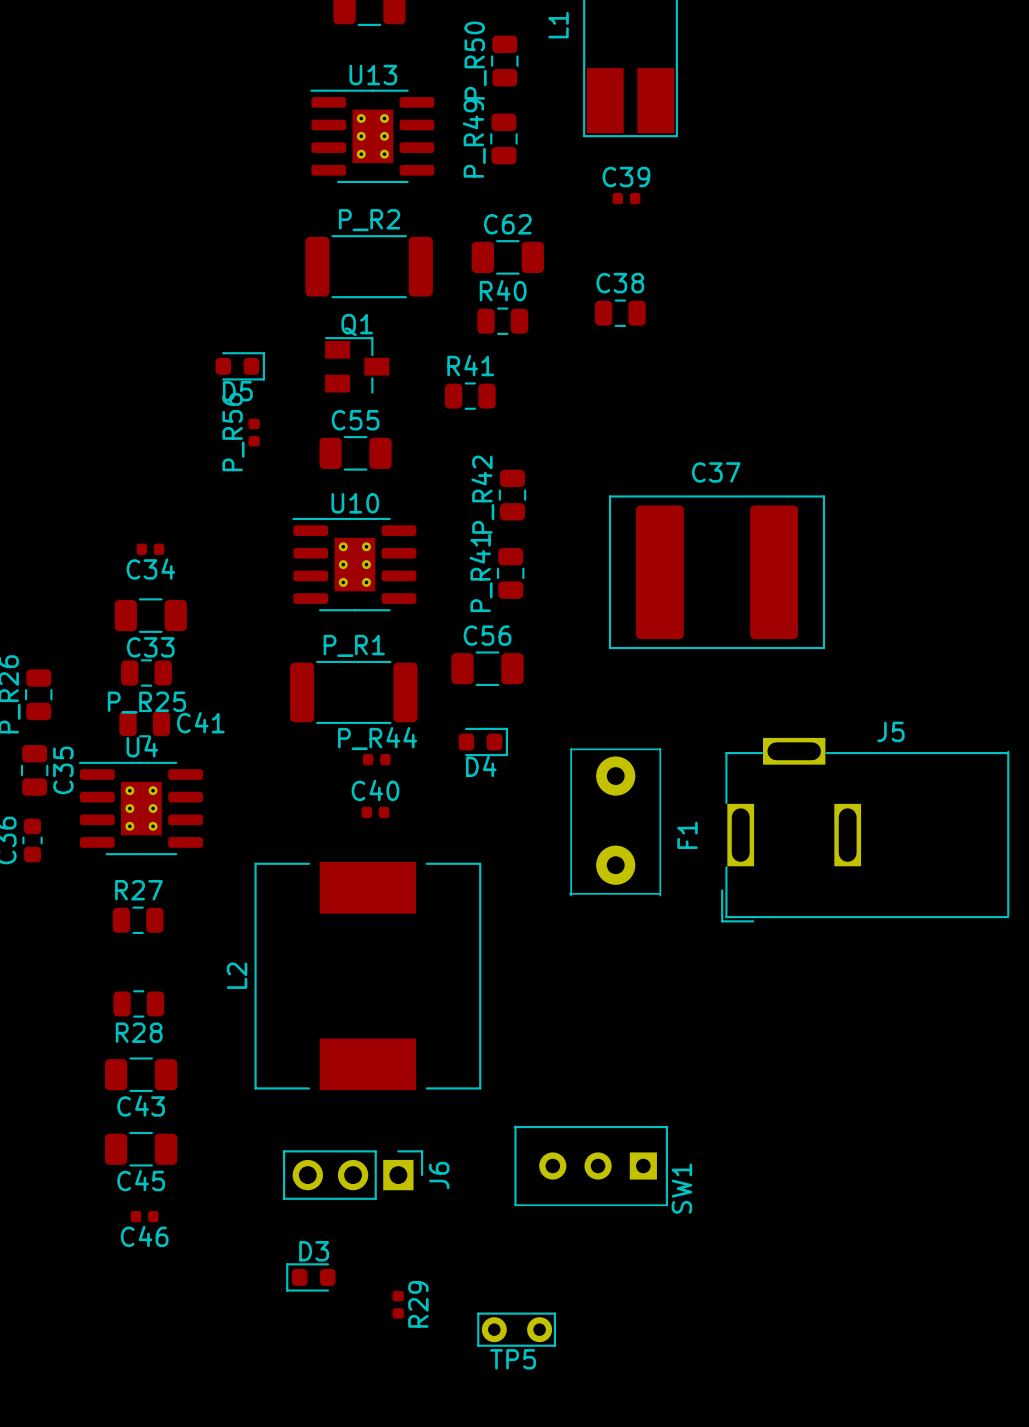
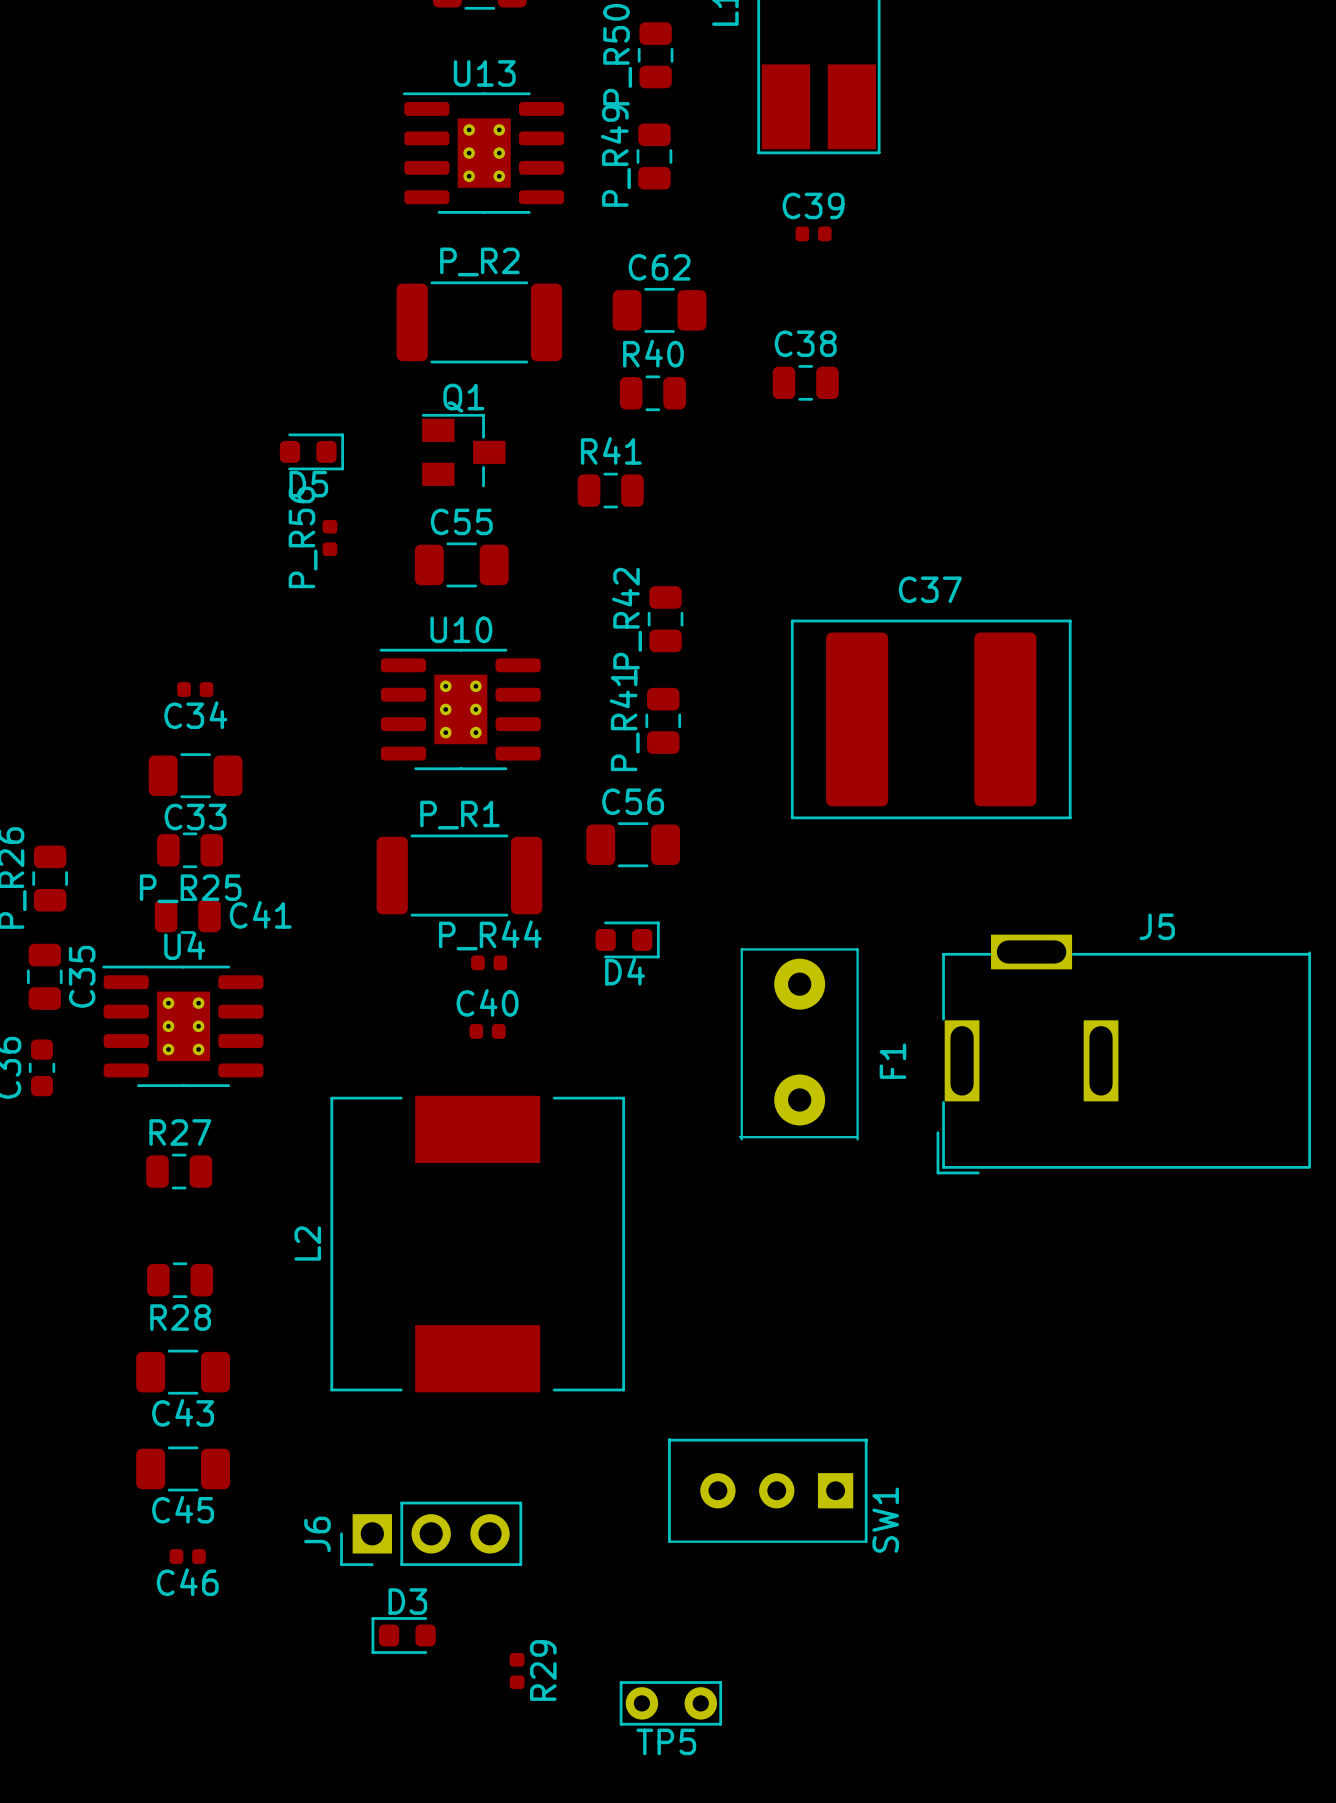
J6 rotation: 0° (353, 1175) -> 180° (431, 1533)

